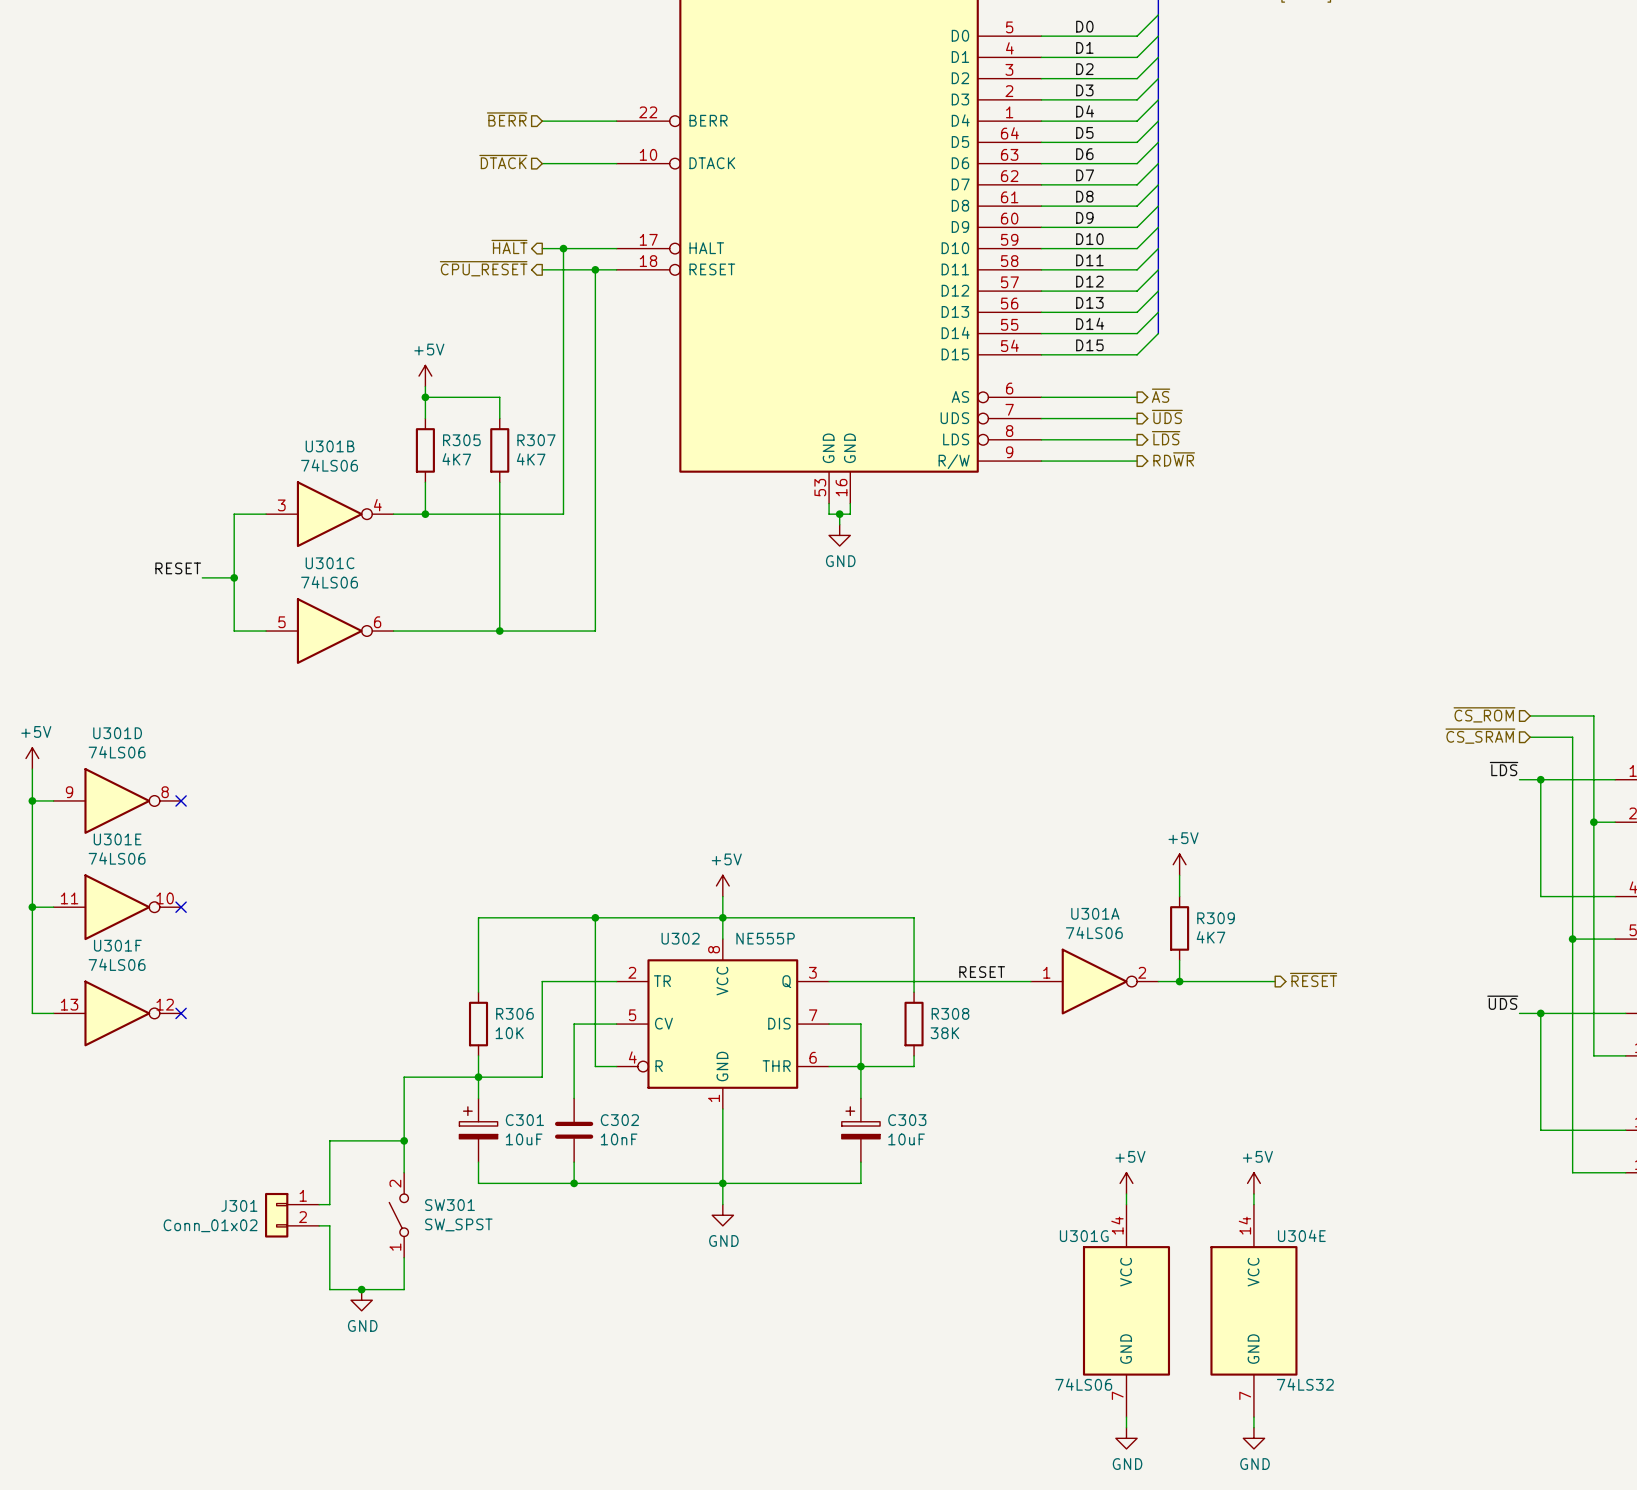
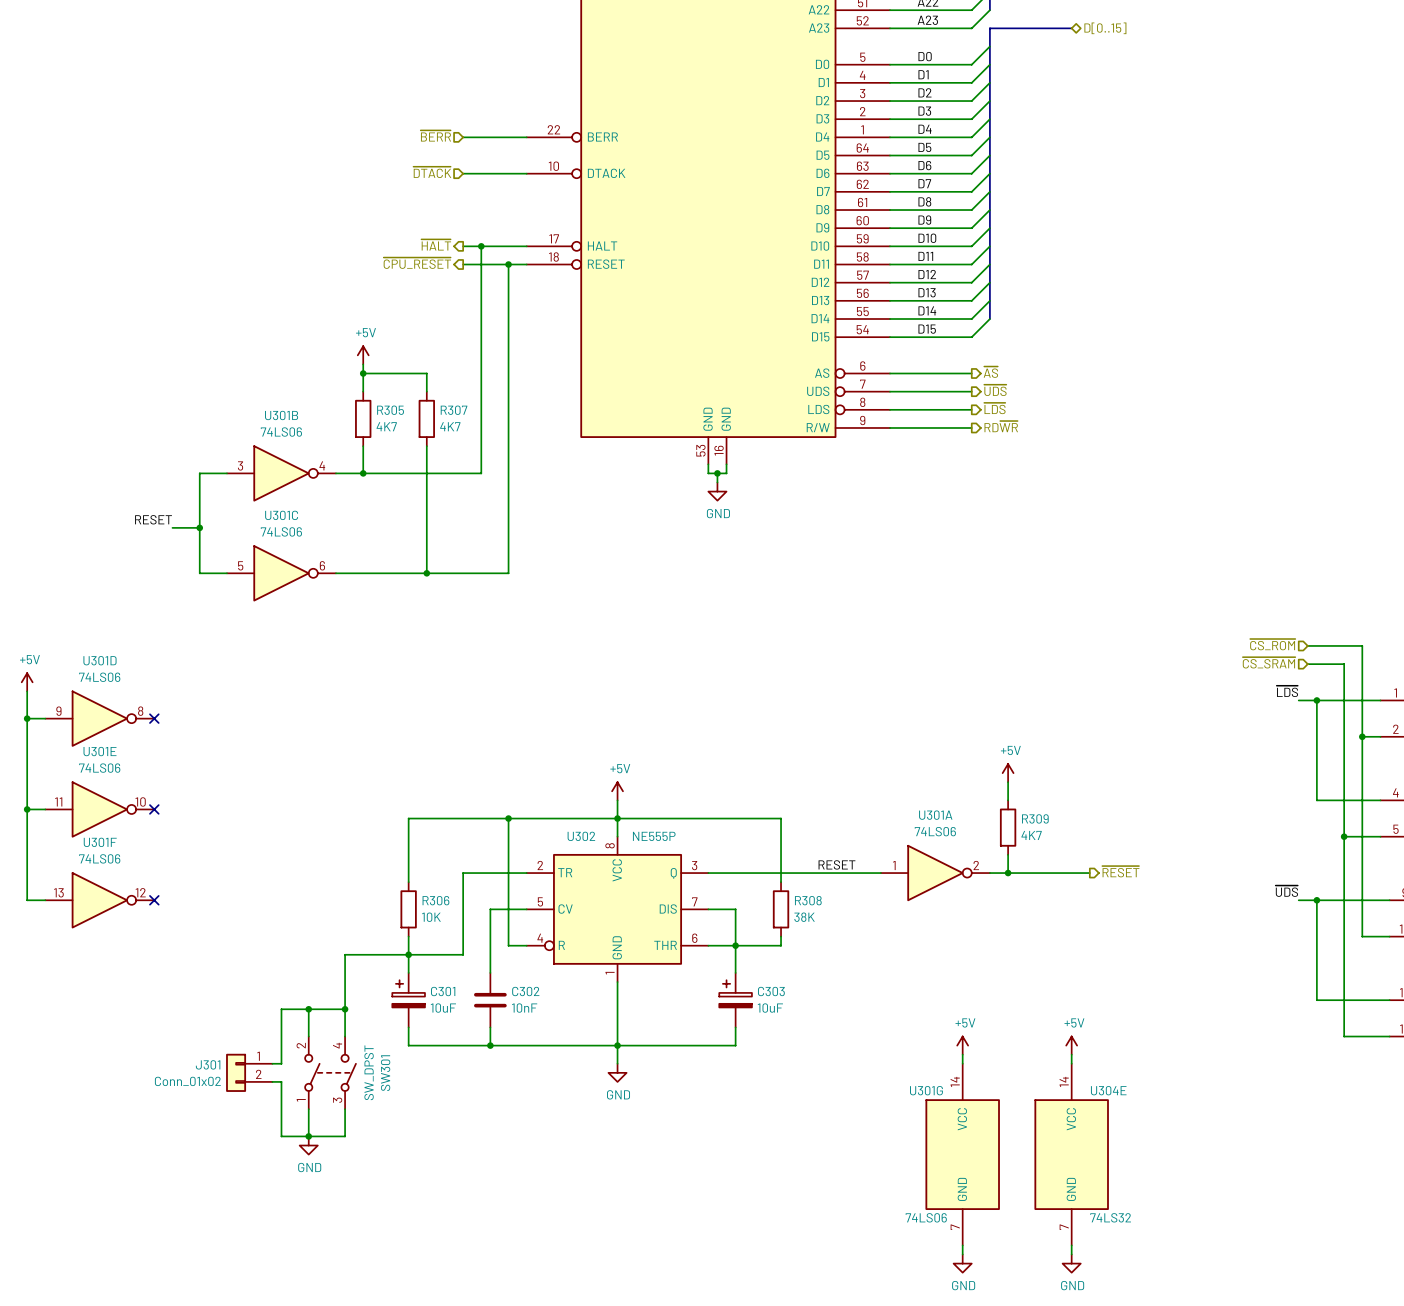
wire: none -> (308, 1009) (308, 1036)
junction: none -> (308, 1009)
SW301 symbol: [389, 1172, 409, 1258] -> [305, 1036, 356, 1110]
SW301 value: SW_SPST (458, 1224) -> SW_DPST (369, 1072)
wire: none -> (308, 1109) (308, 1136)

